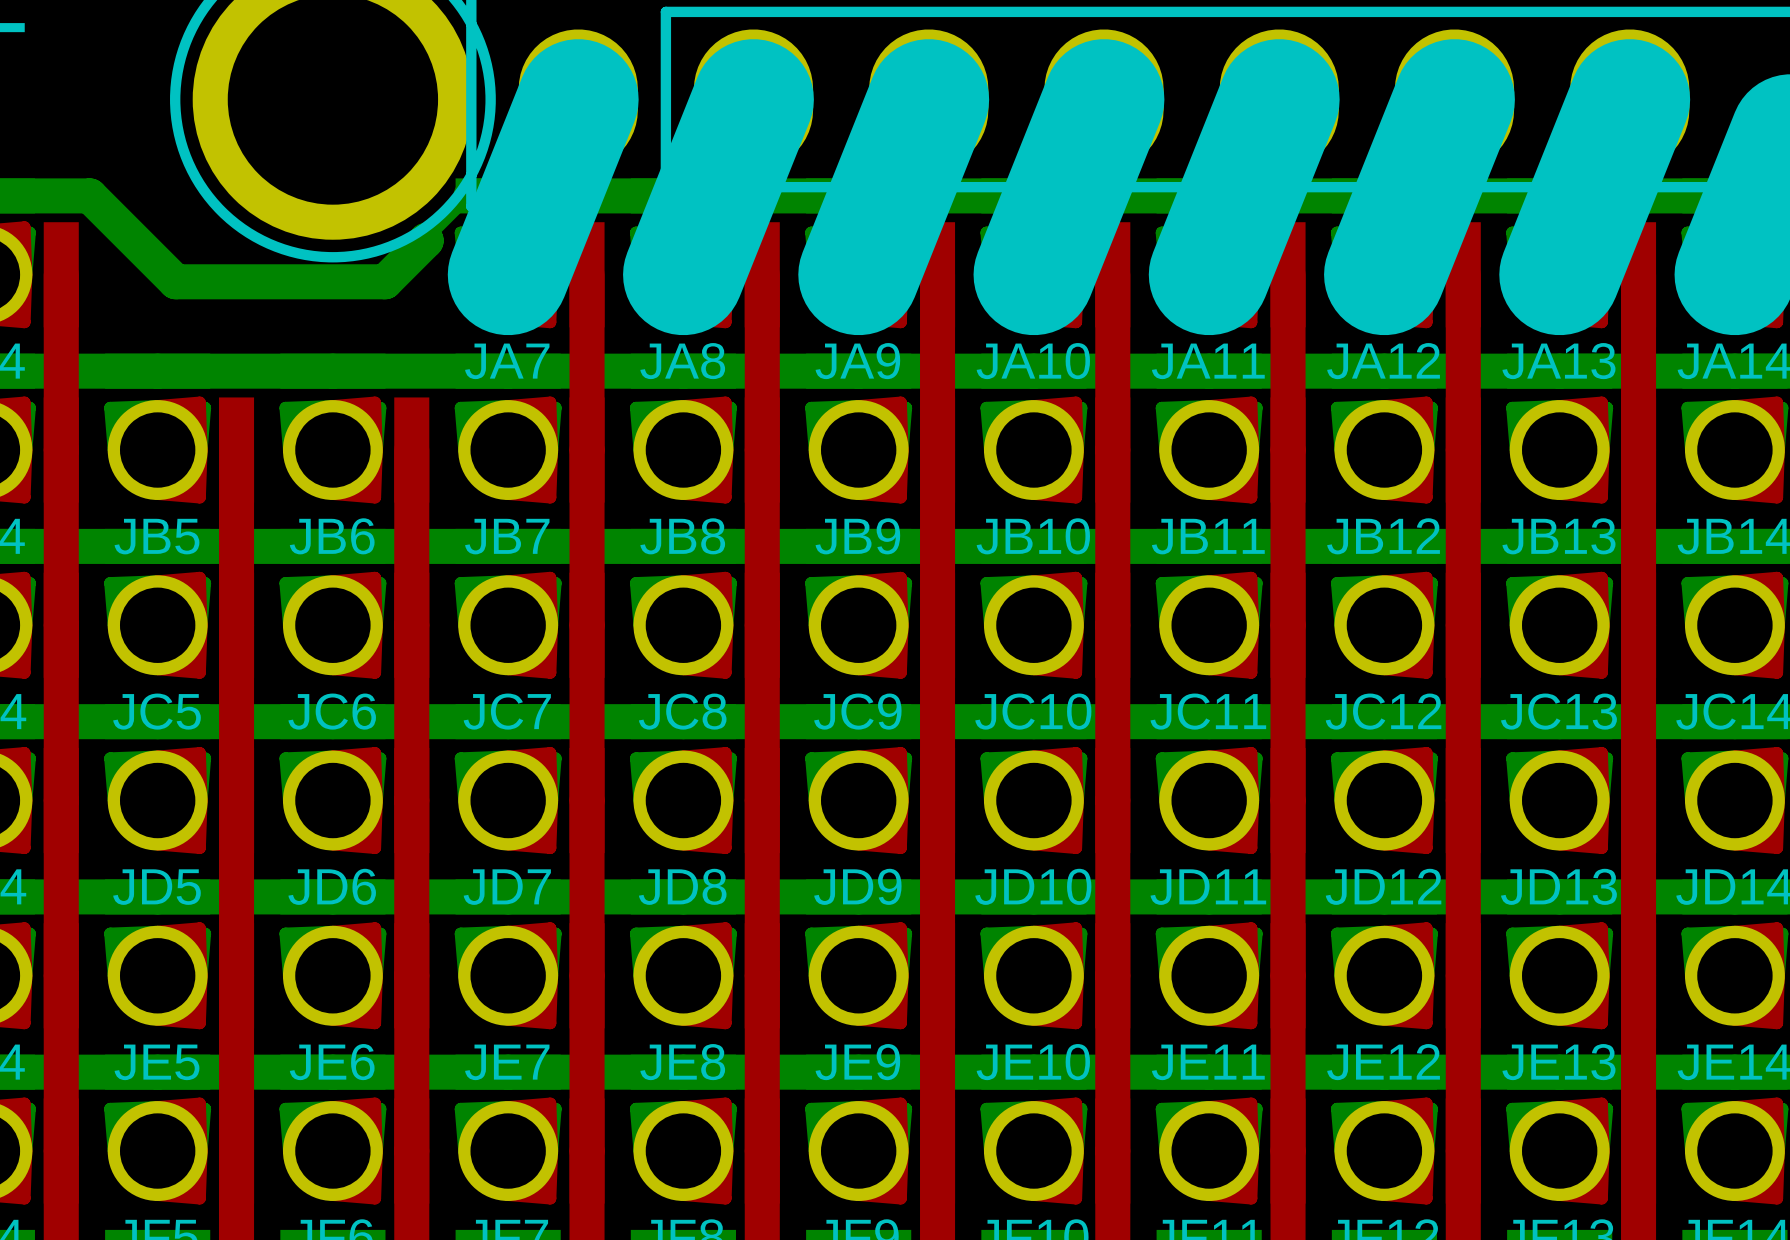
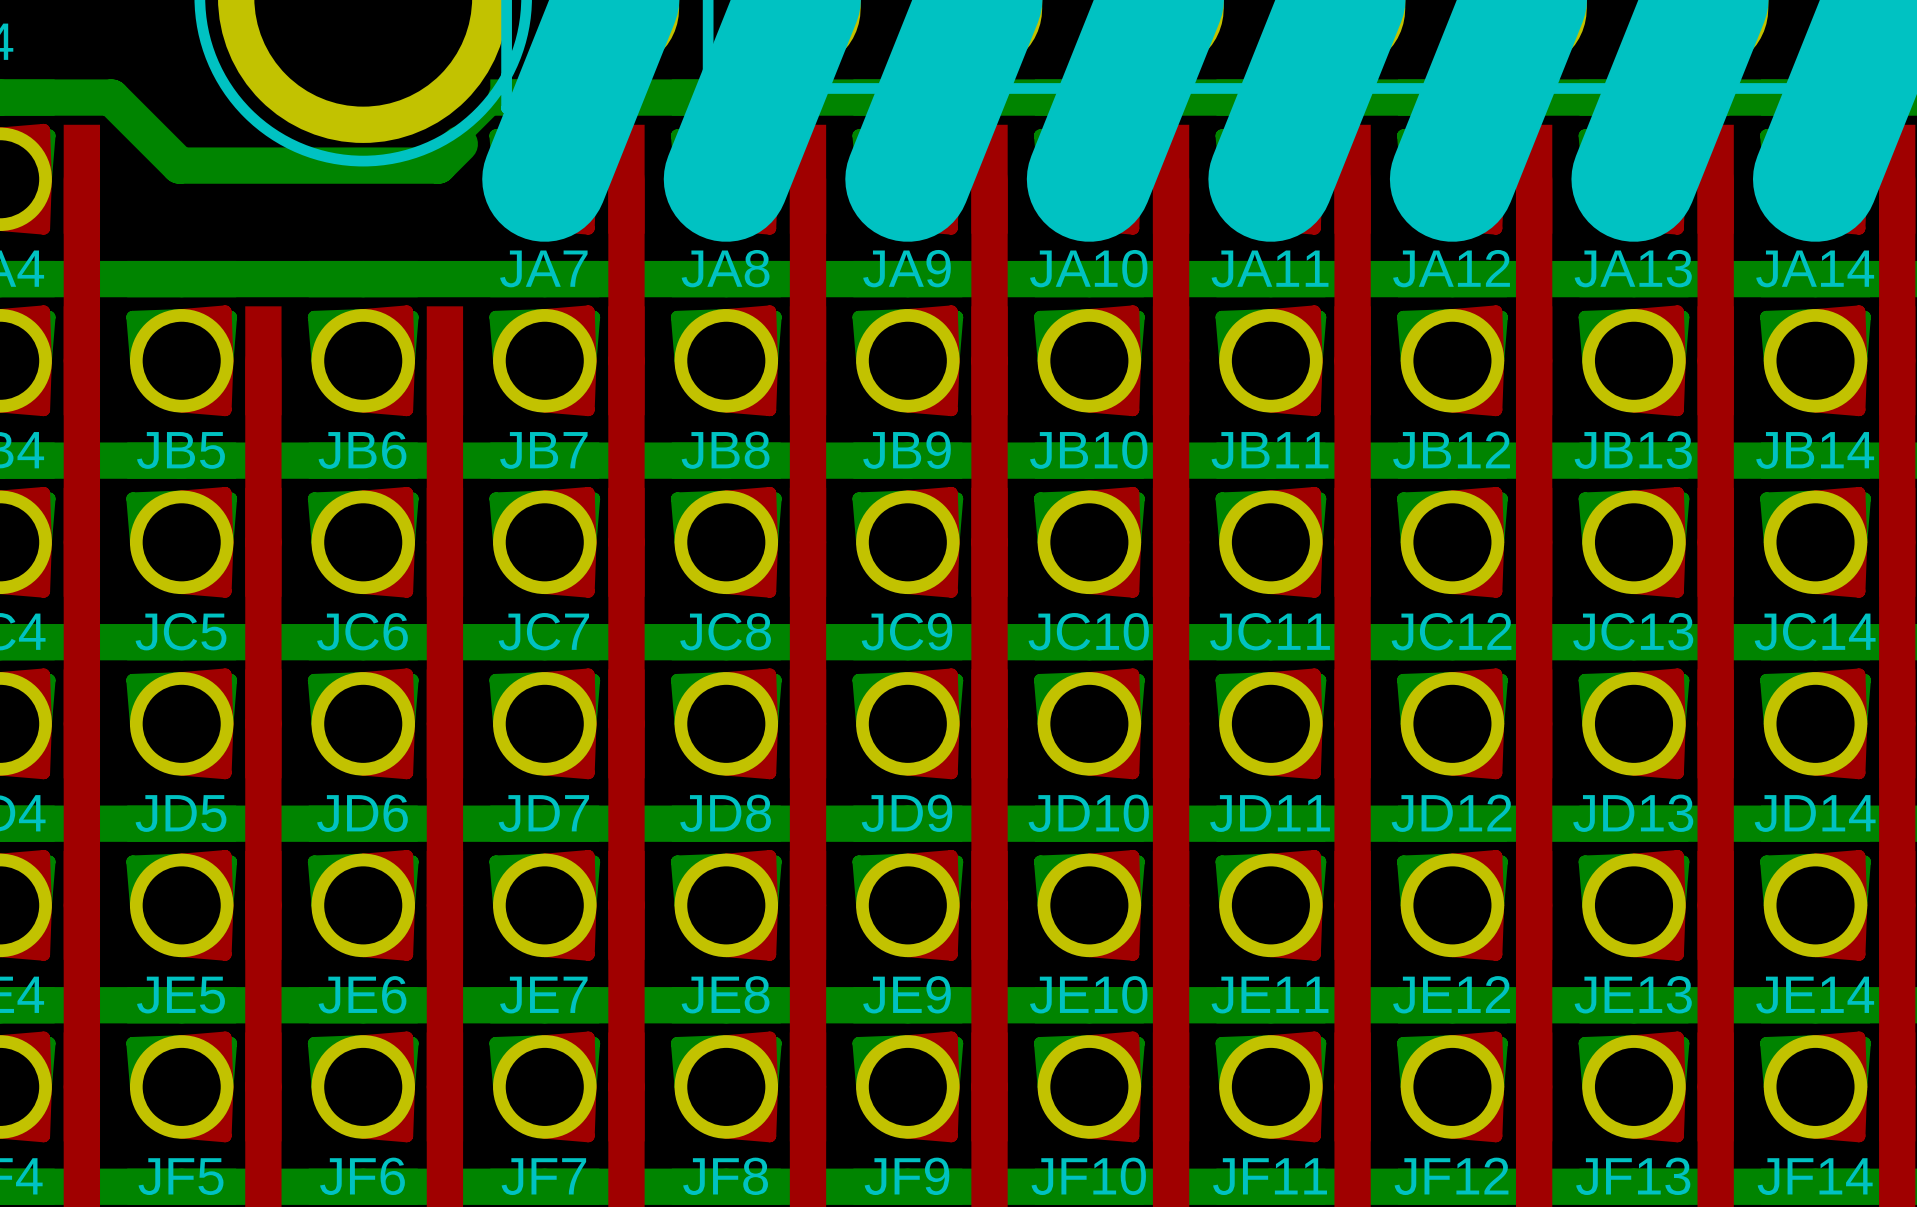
bottom track: (155, 261) (175, 281) (385, 281) (405, 261) -> (179, 165) (438, 165)

